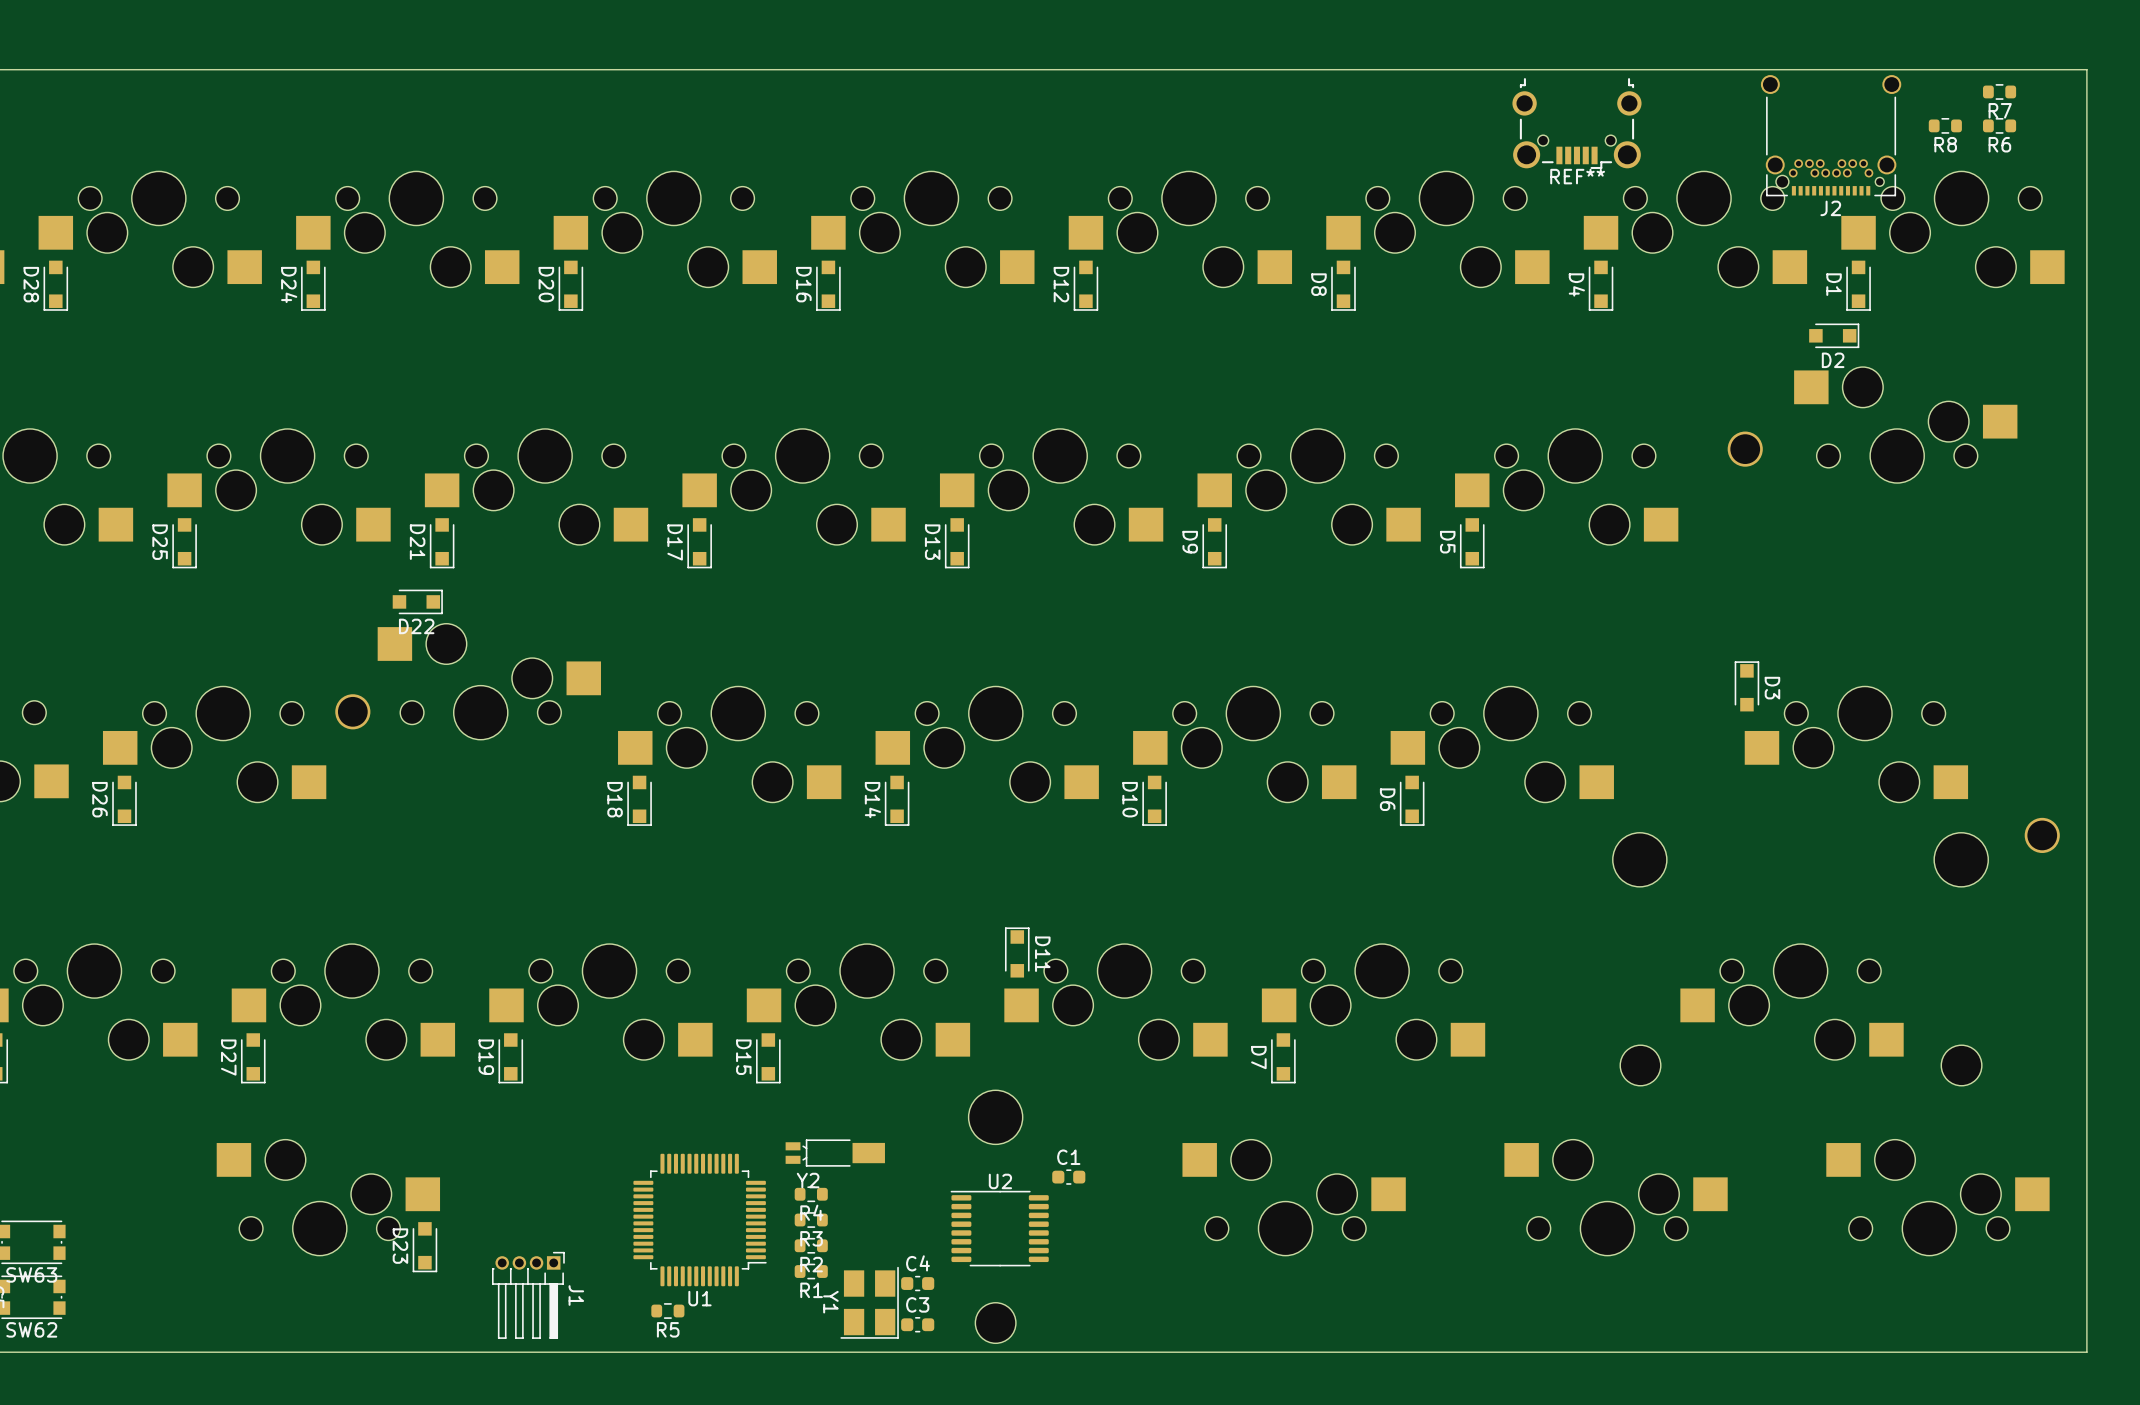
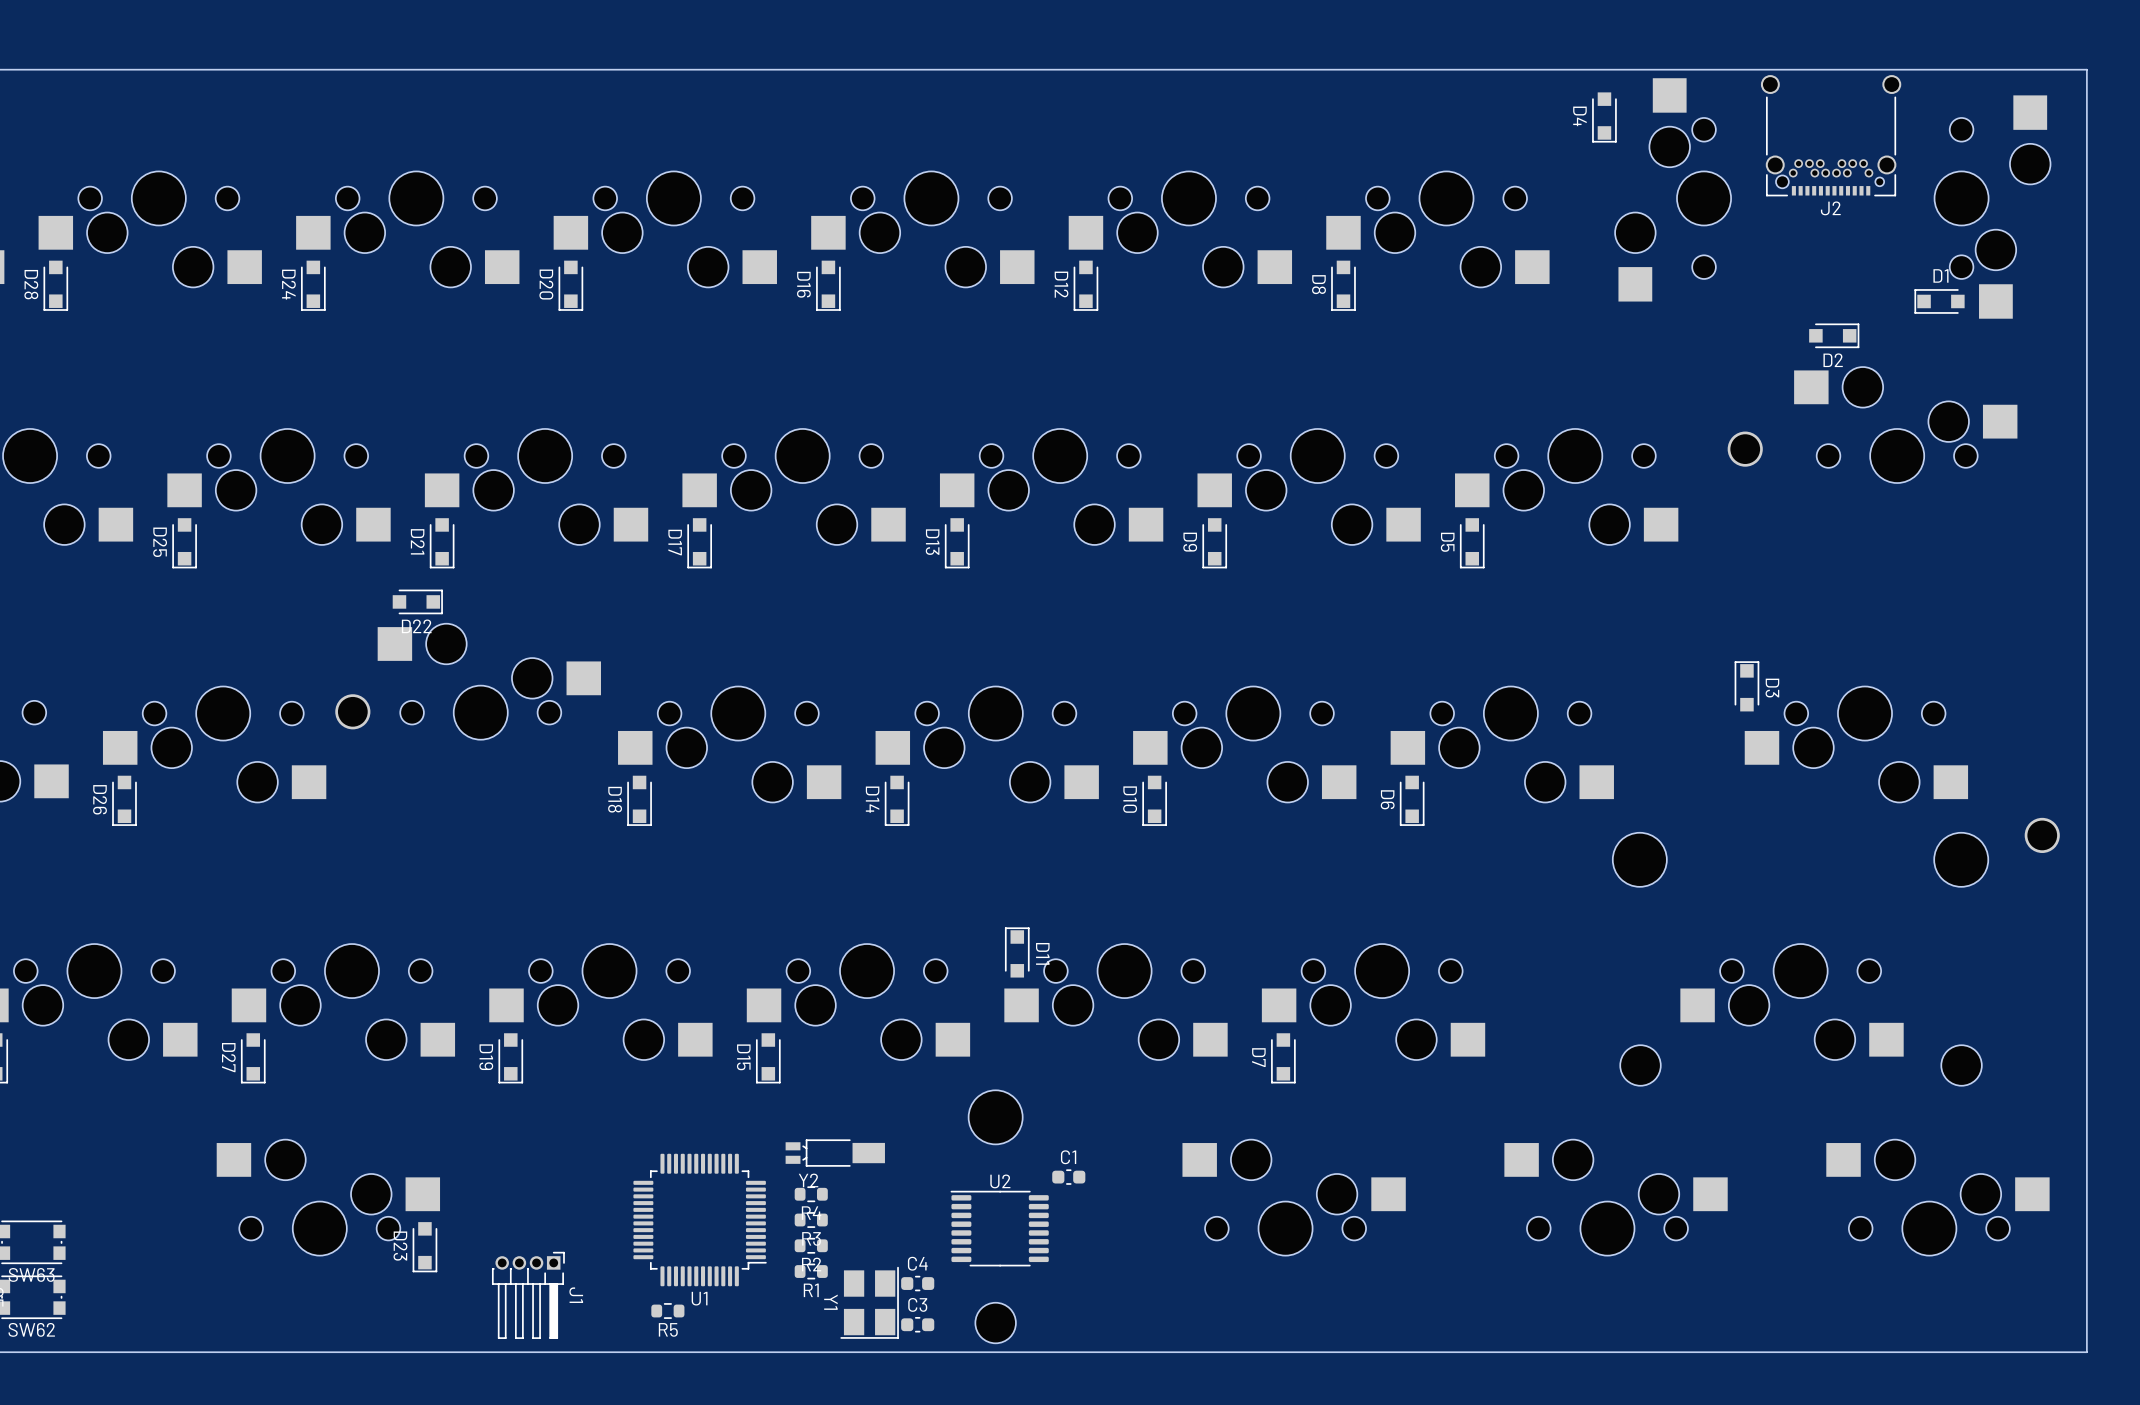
R7: (1999, 91) -> none
REF**: (1576, 123) -> none
R8: (1945, 125) -> none
R6: (1999, 125) -> none
part rotation: 0° (1695, 229) -> 90° clockwise (1673, 189)
part rotation: 0° (1952, 229) -> 90° counterclockwise (1992, 207)
D4 position: (1601, 285) -> (1604, 117)
D1 rotation: 0° (1858, 285) -> 90° clockwise (1939, 301)
D1 position: (1858, 285) -> (1939, 301)

